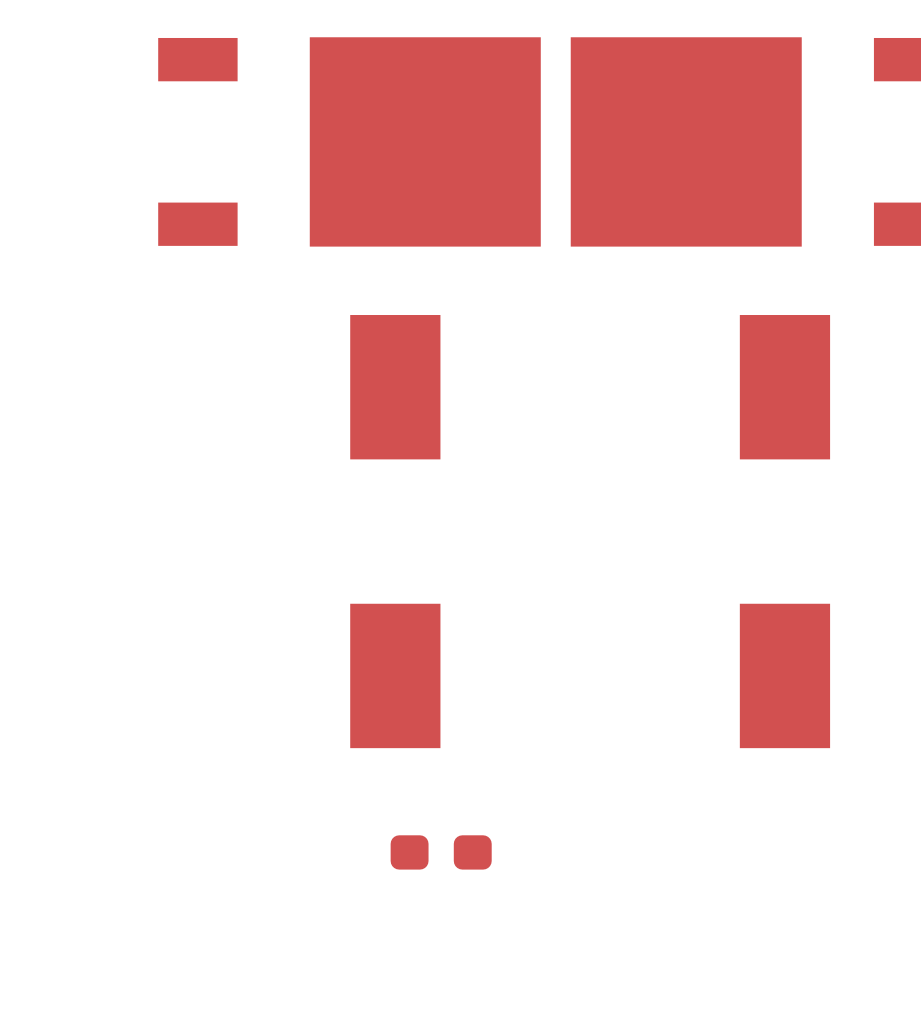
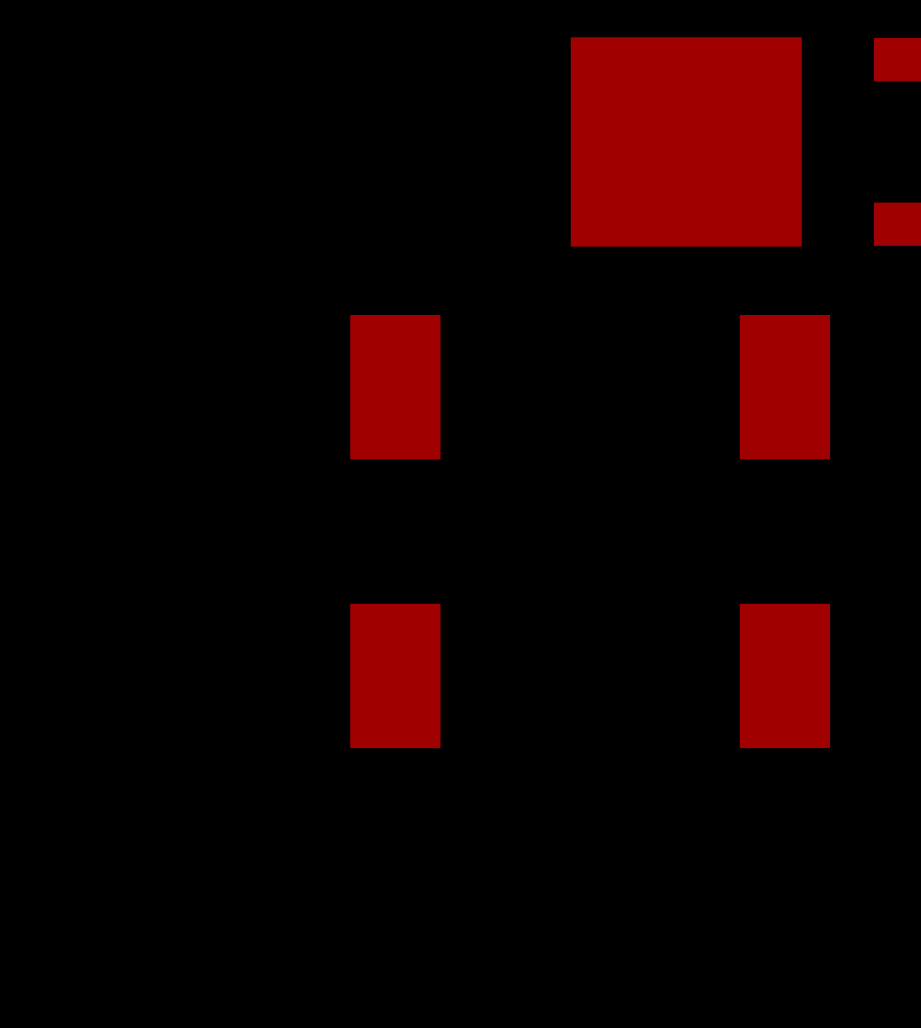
part: (349, 141) -> none
part: (441, 852) -> none

